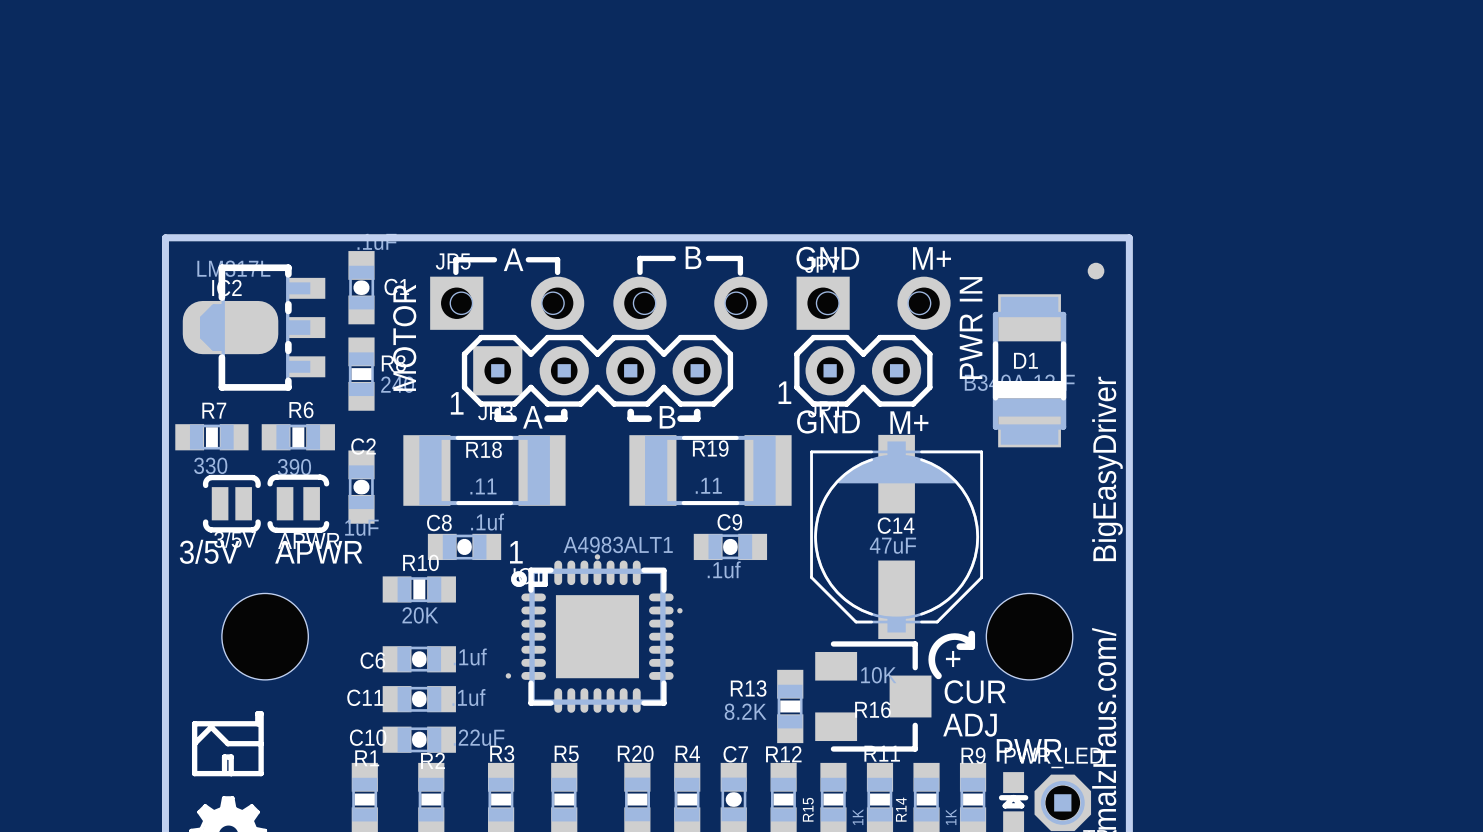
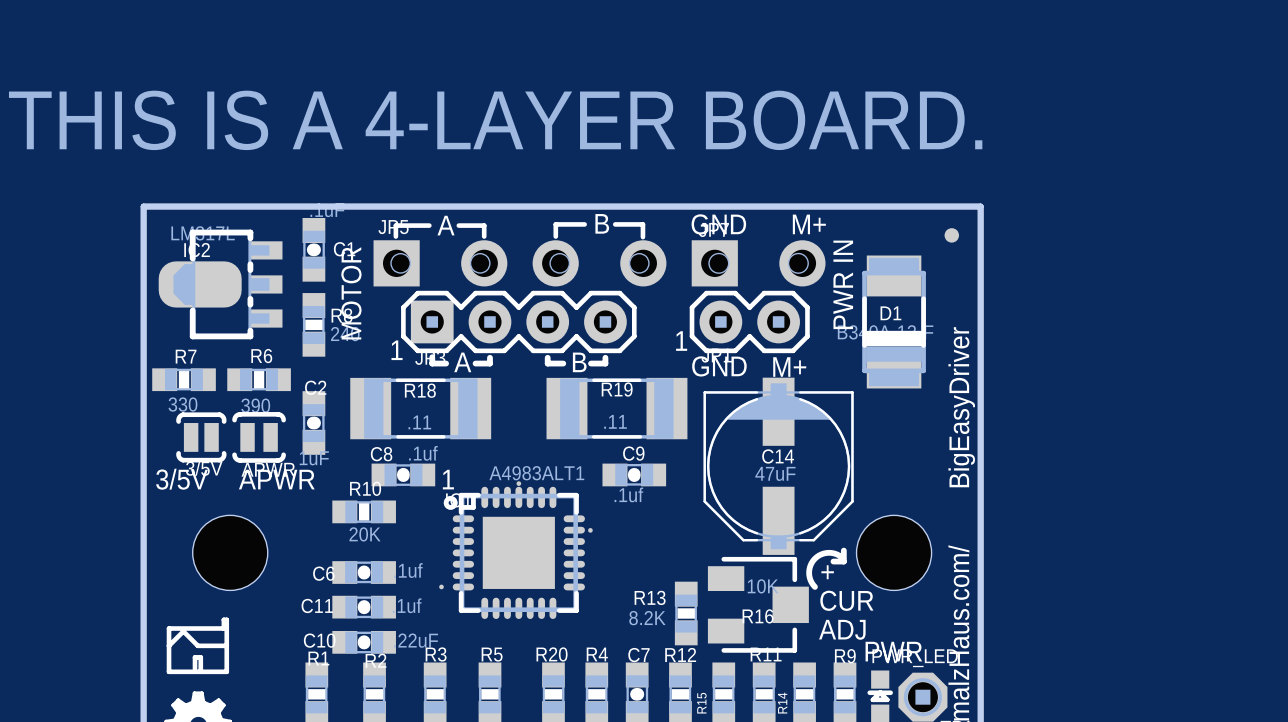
text: none -> THIS IS A 4-LAYER BOARD. (495, 120)
R15 value: 1K (858, 817) -> none
R14 value: 1K (951, 817) -> none

